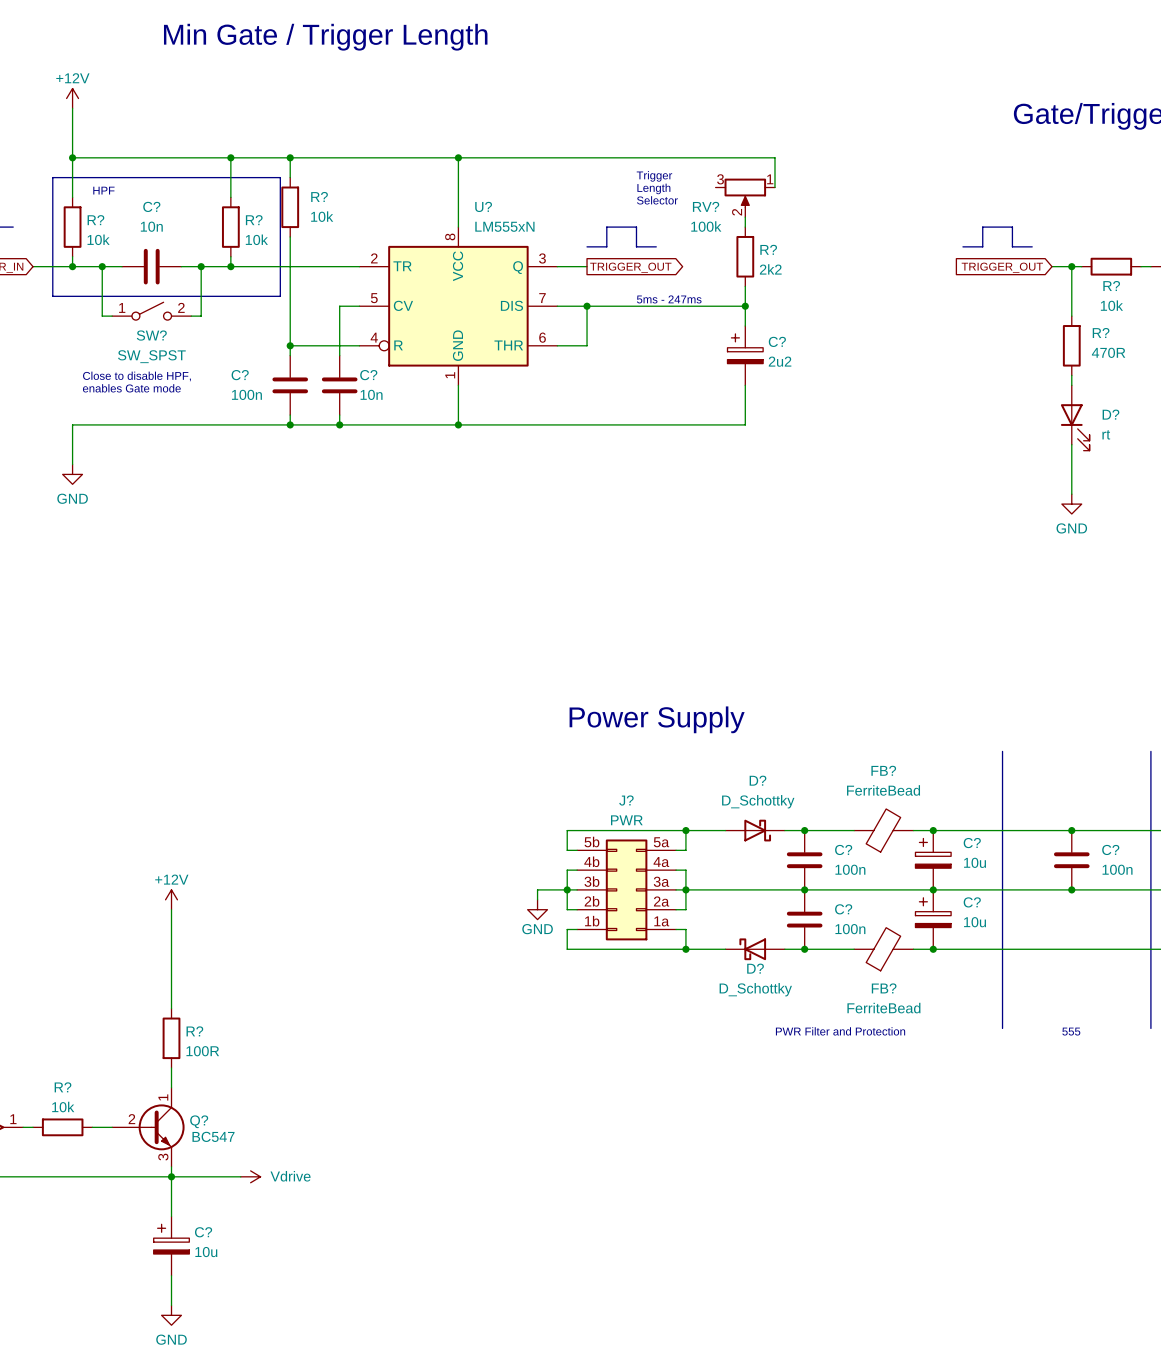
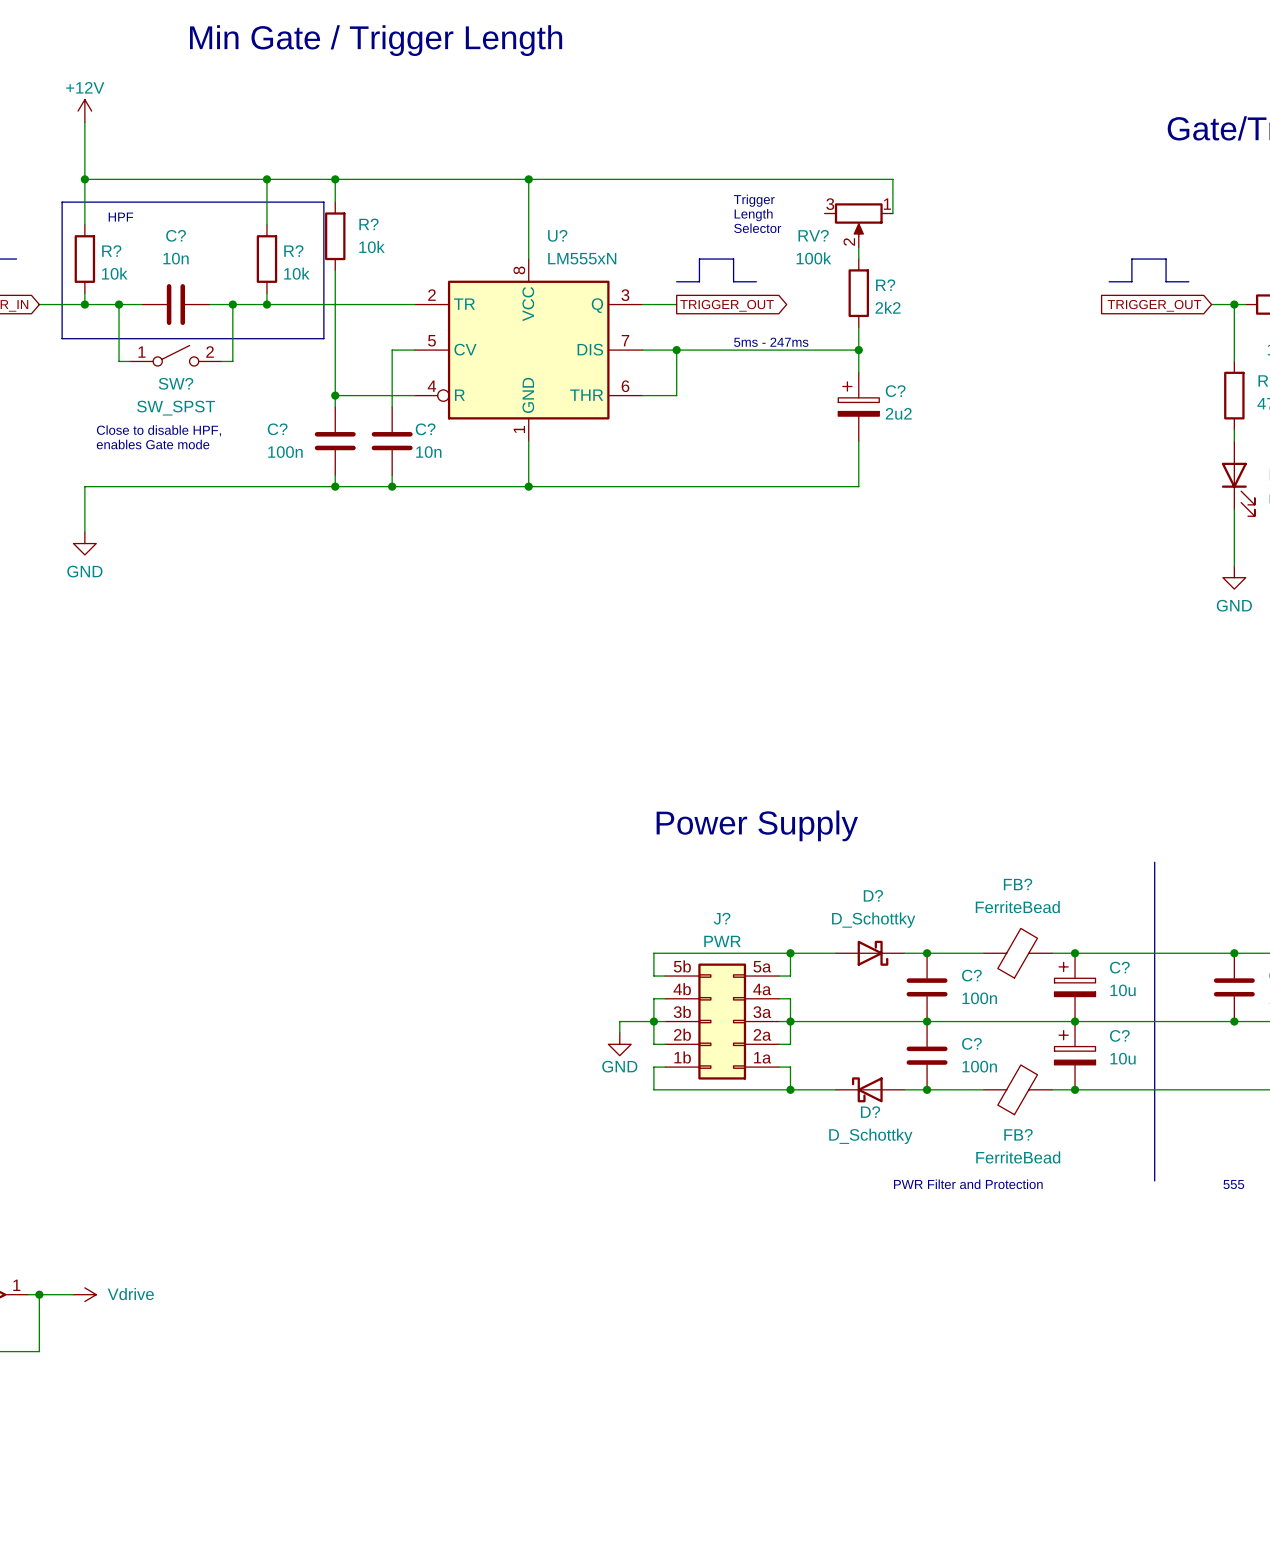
power symbol: +12V (171, 899) -> none
wire: (171, 909) (171, 1008) -> none
R?: 100R (171, 1038) -> none
wire: (171, 1068) (171, 1087) -> none
junction: none -> (39, 1294)
R?: 10k (62, 1127) -> none
wire: (92, 1127) (112, 1127) -> none
Q?: BC547 (148, 1127) -> none
wire: (171, 1166) (171, 1216) -> none
wire: (33, 1176) (240, 1176) -> (39, 1351) (39, 1294) (73, 1294)
junction: (171, 1176) -> none
power symbol position: Vdrive (250, 1176) -> Vdrive (84, 1294)
C?: 10u (171, 1246) -> none
wire: (171, 1275) (171, 1305) -> none
power symbol: GND (171, 1315) -> none

